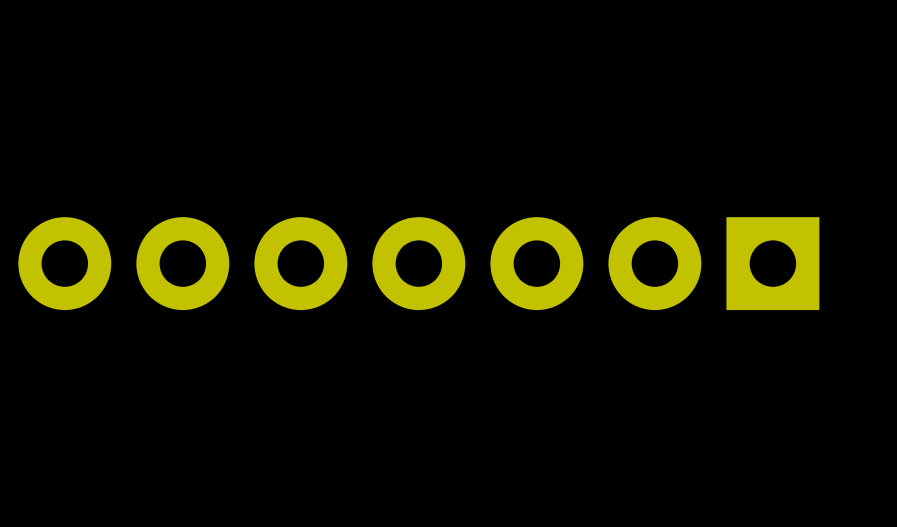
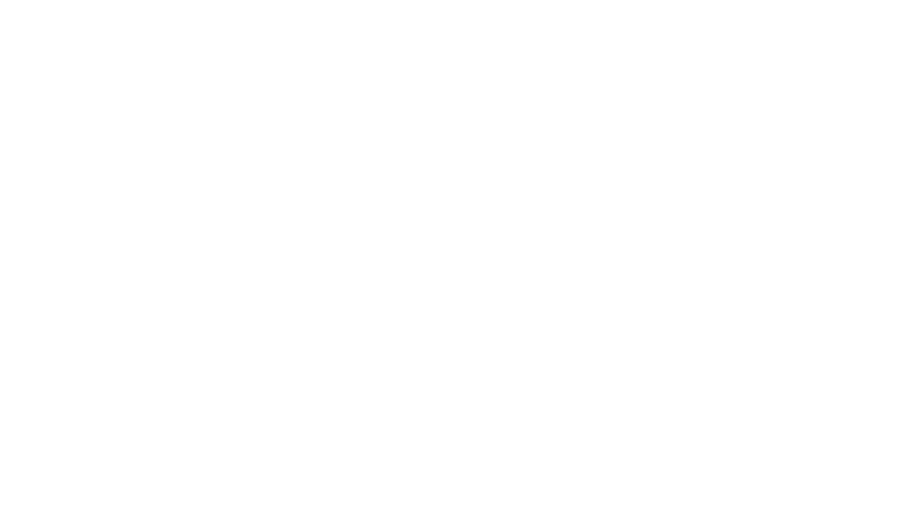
part: (418, 263) -> none

